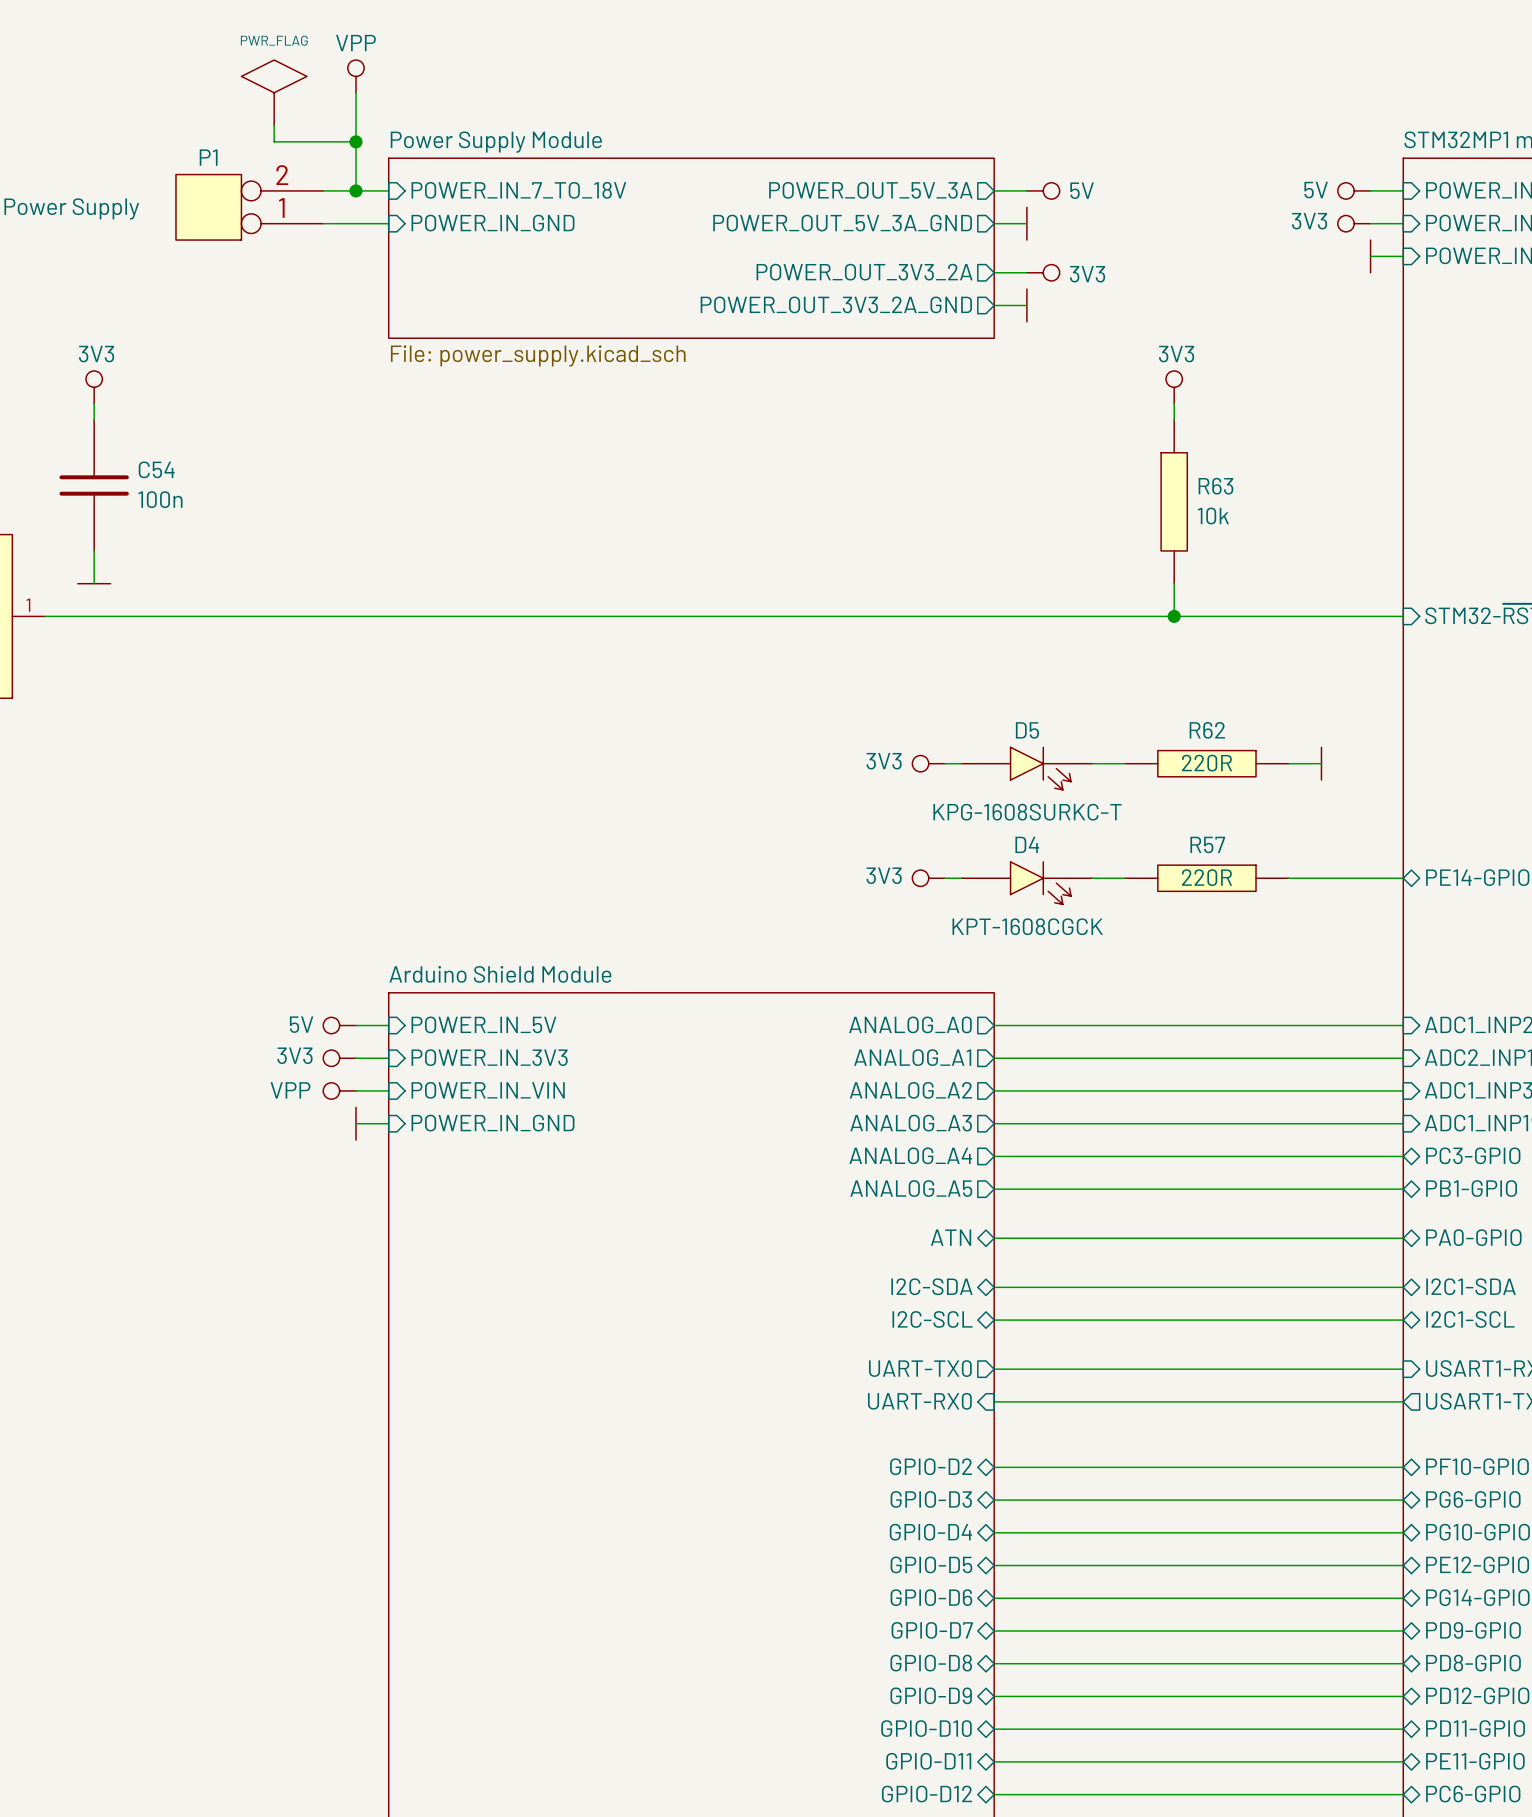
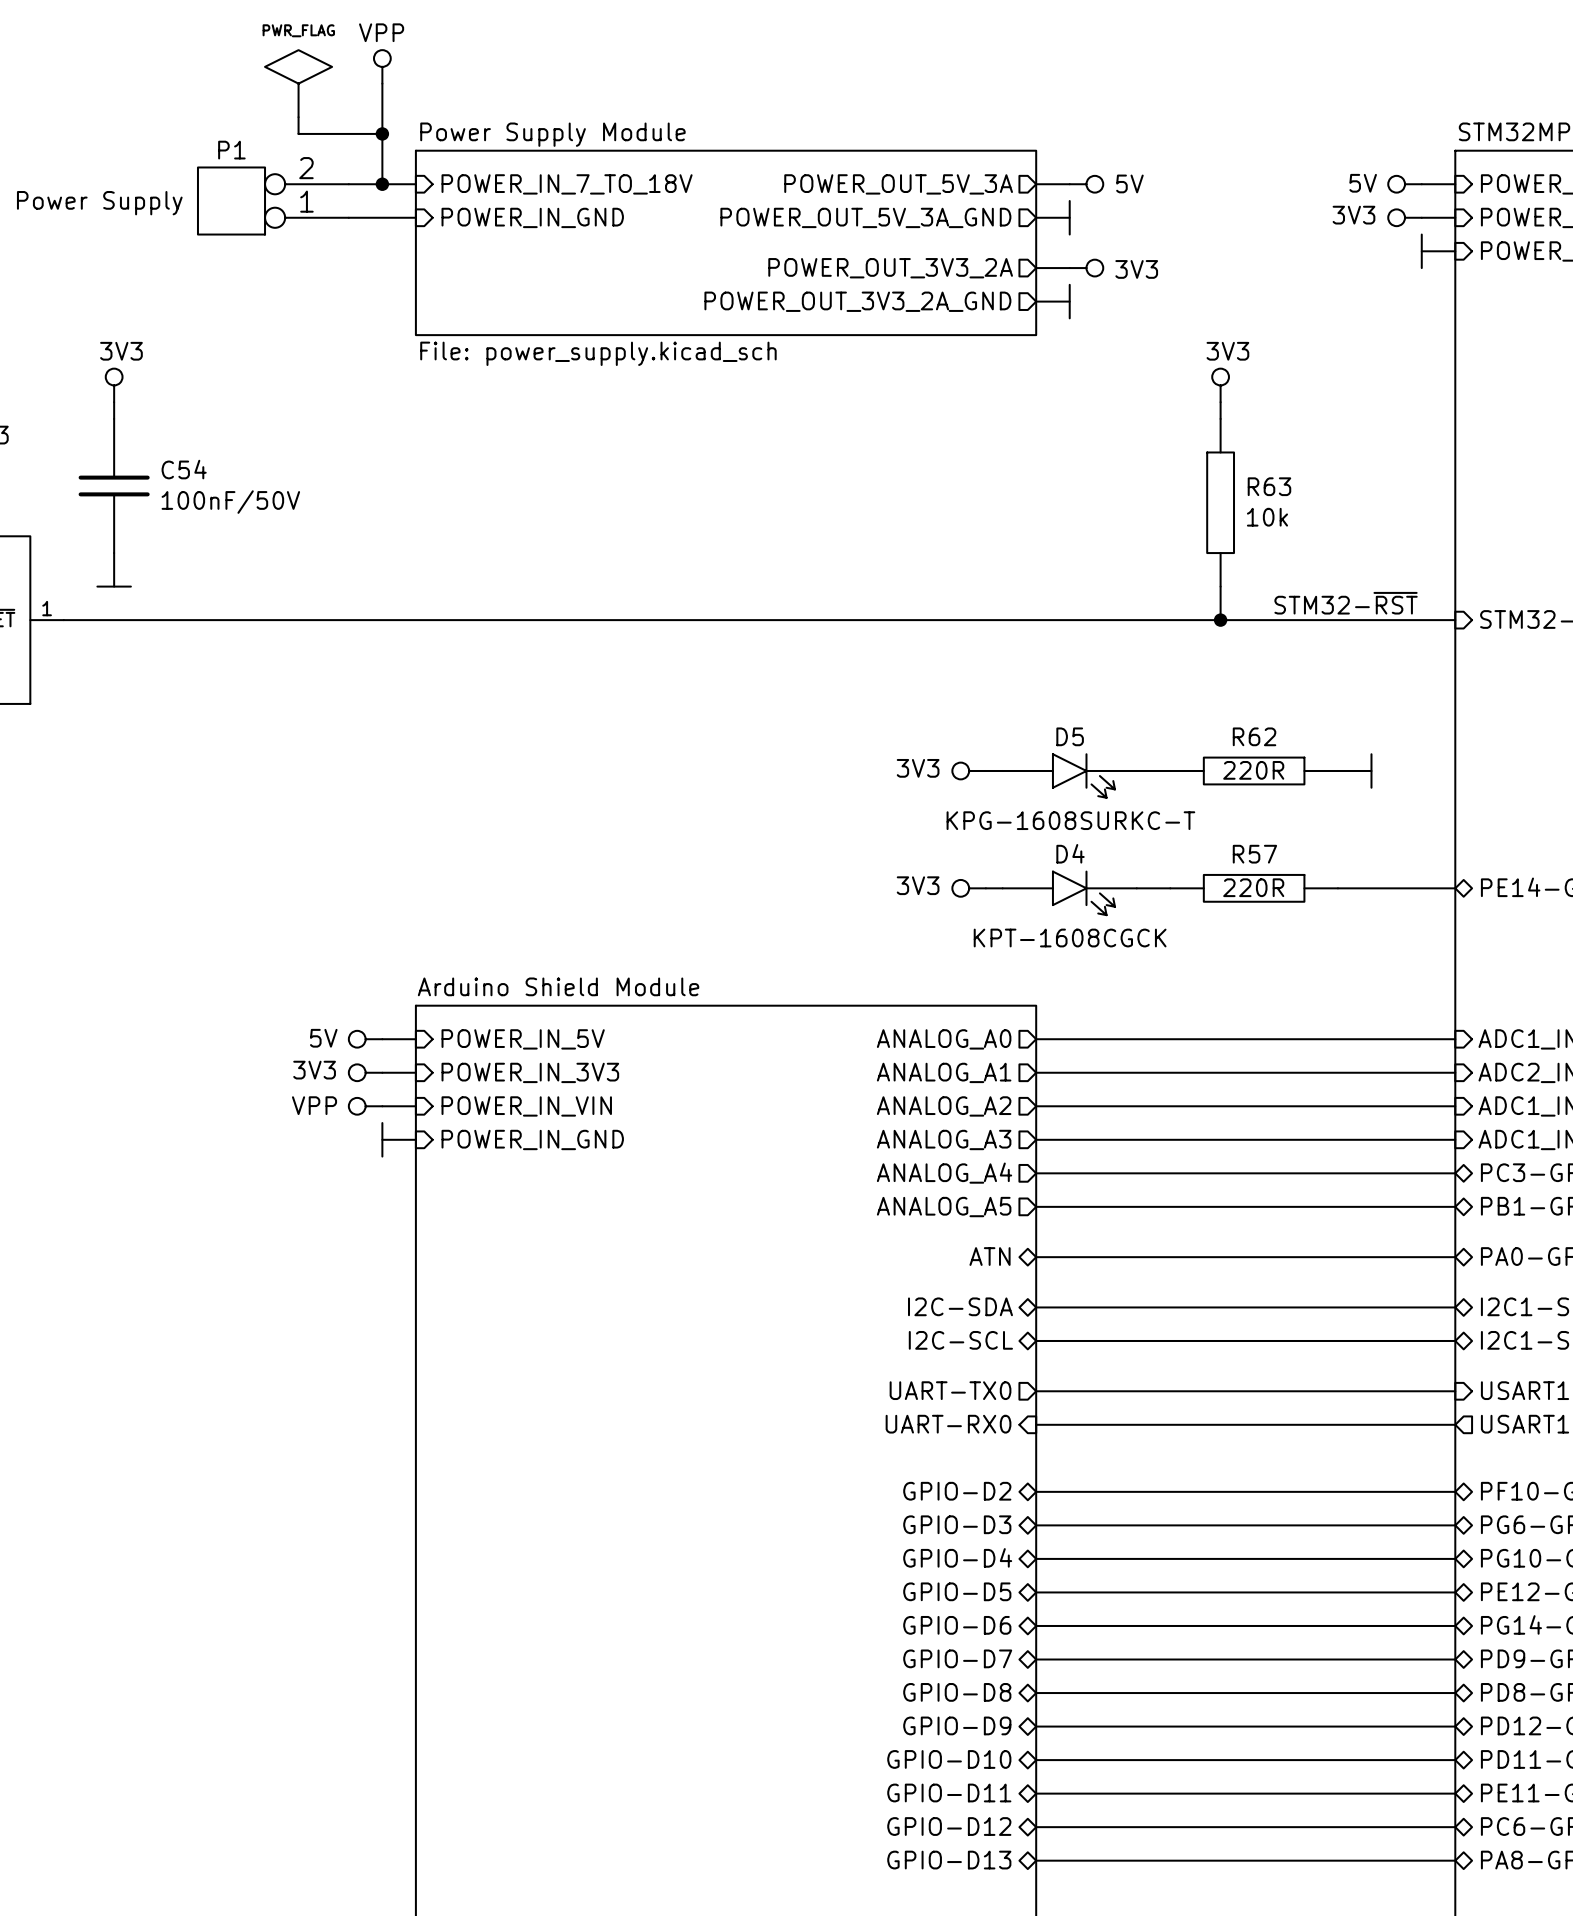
C54 value: 100n (160, 499) -> 100nF/50V (230, 502)
label: none -> STM32-~{RST} (1346, 603)

